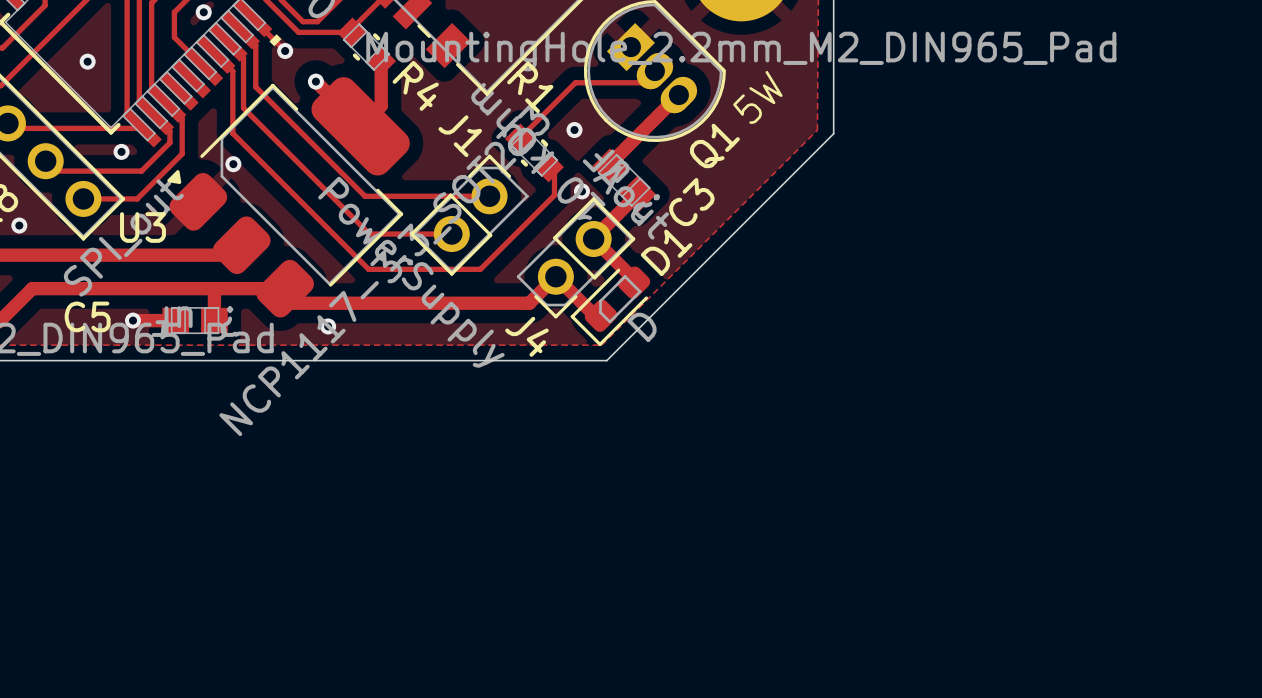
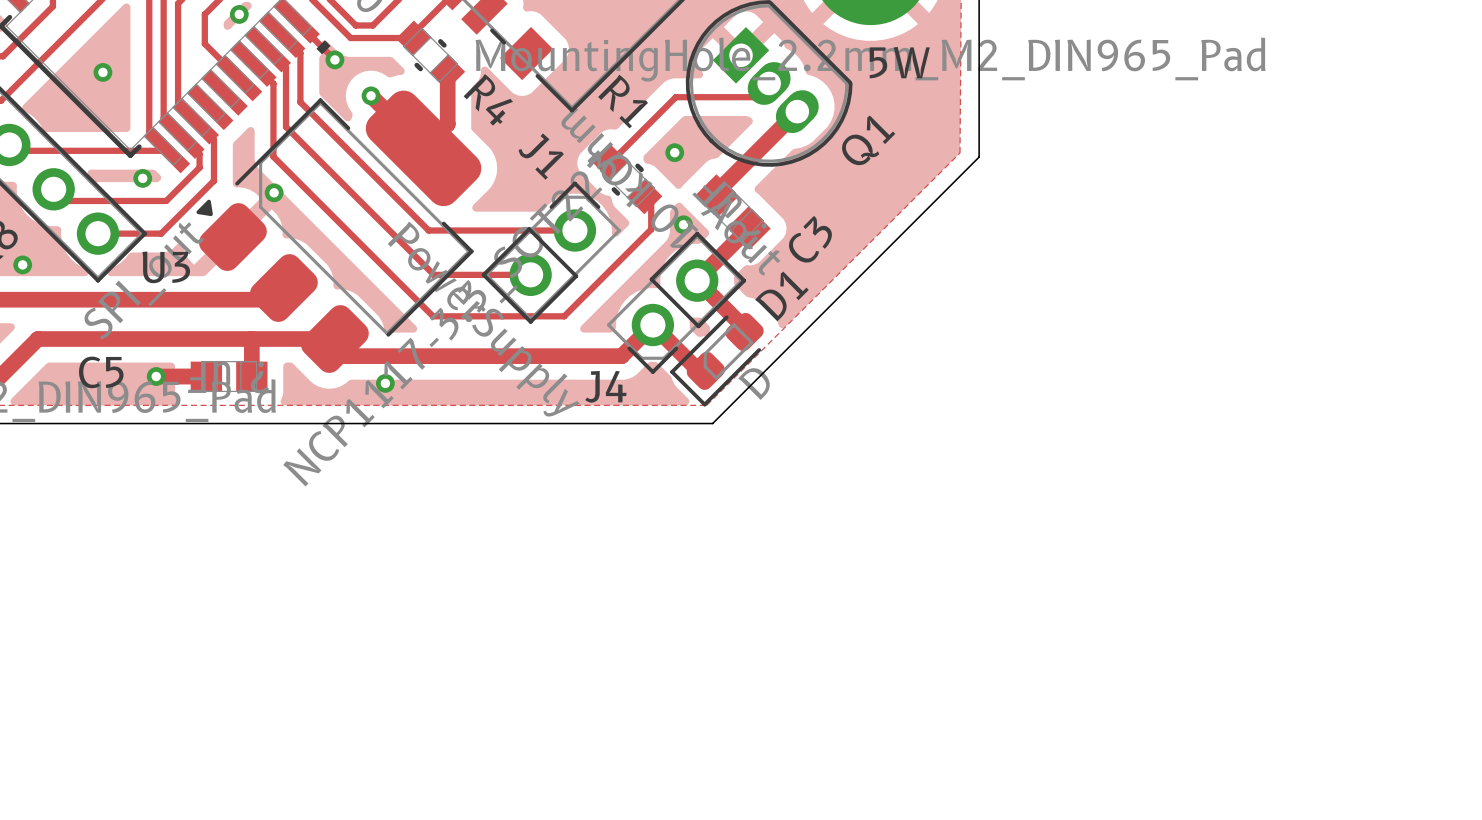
text rotation: 0° (757, 97) -> 45° clockwise (899, 62)
Q1 name position: Q1 (714, 145) -> Q1 (868, 140)
J4 name rotation: 0° (526, 336) -> 45° counterclockwise (605, 386)

